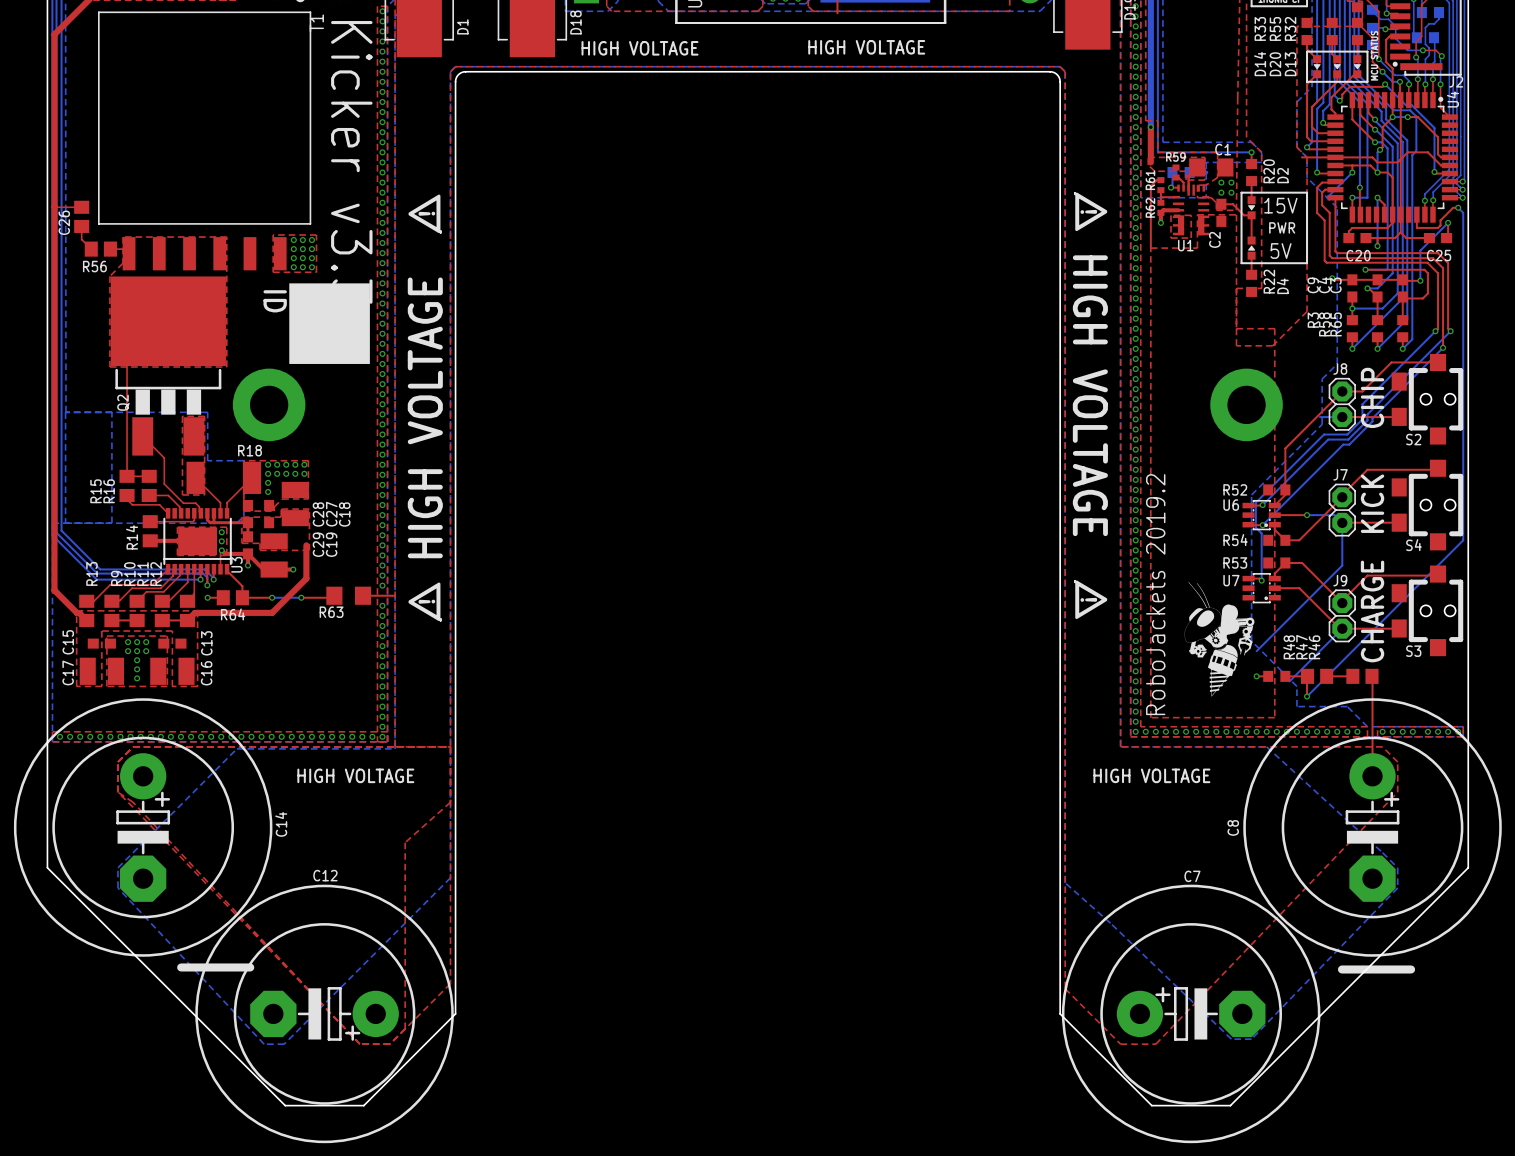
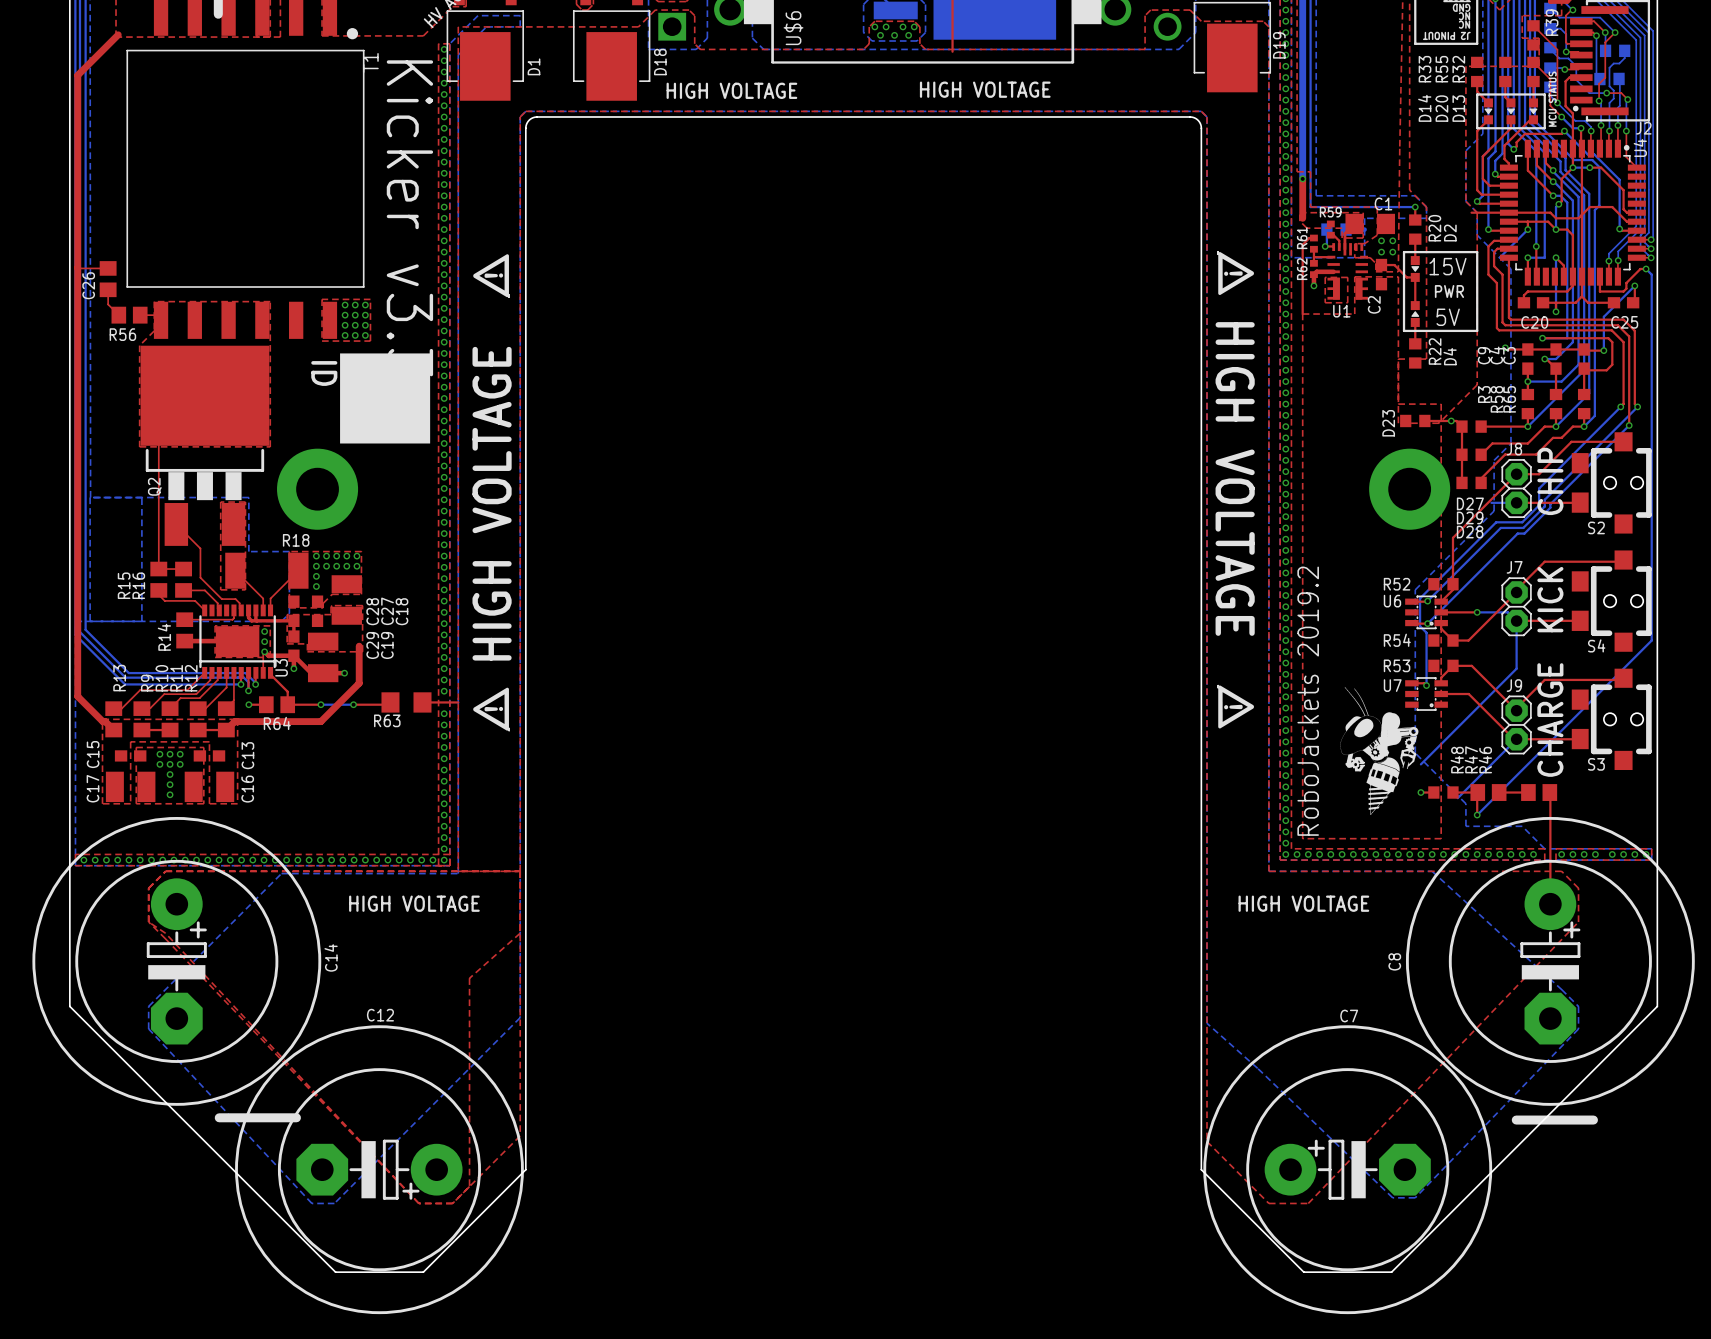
D23: none -> (1415, 420)
top track: none -> (1424, 420) (1456, 420) (1462, 426) (1462, 482)
via: none -> (1451, 420)
D27: none -> (1471, 426)
top track: none -> (1481, 426) (1527, 426)
top track: none -> (1556, 426) (1544, 426) (1527, 443) (1492, 443) (1481, 454)
top track: none -> (1584, 426) (1572, 426) (1561, 437) (1553, 437) (1536, 454) (1505, 454) (1481, 478) (1481, 482)
D29: none -> (1471, 454)
D28: none -> (1471, 482)

